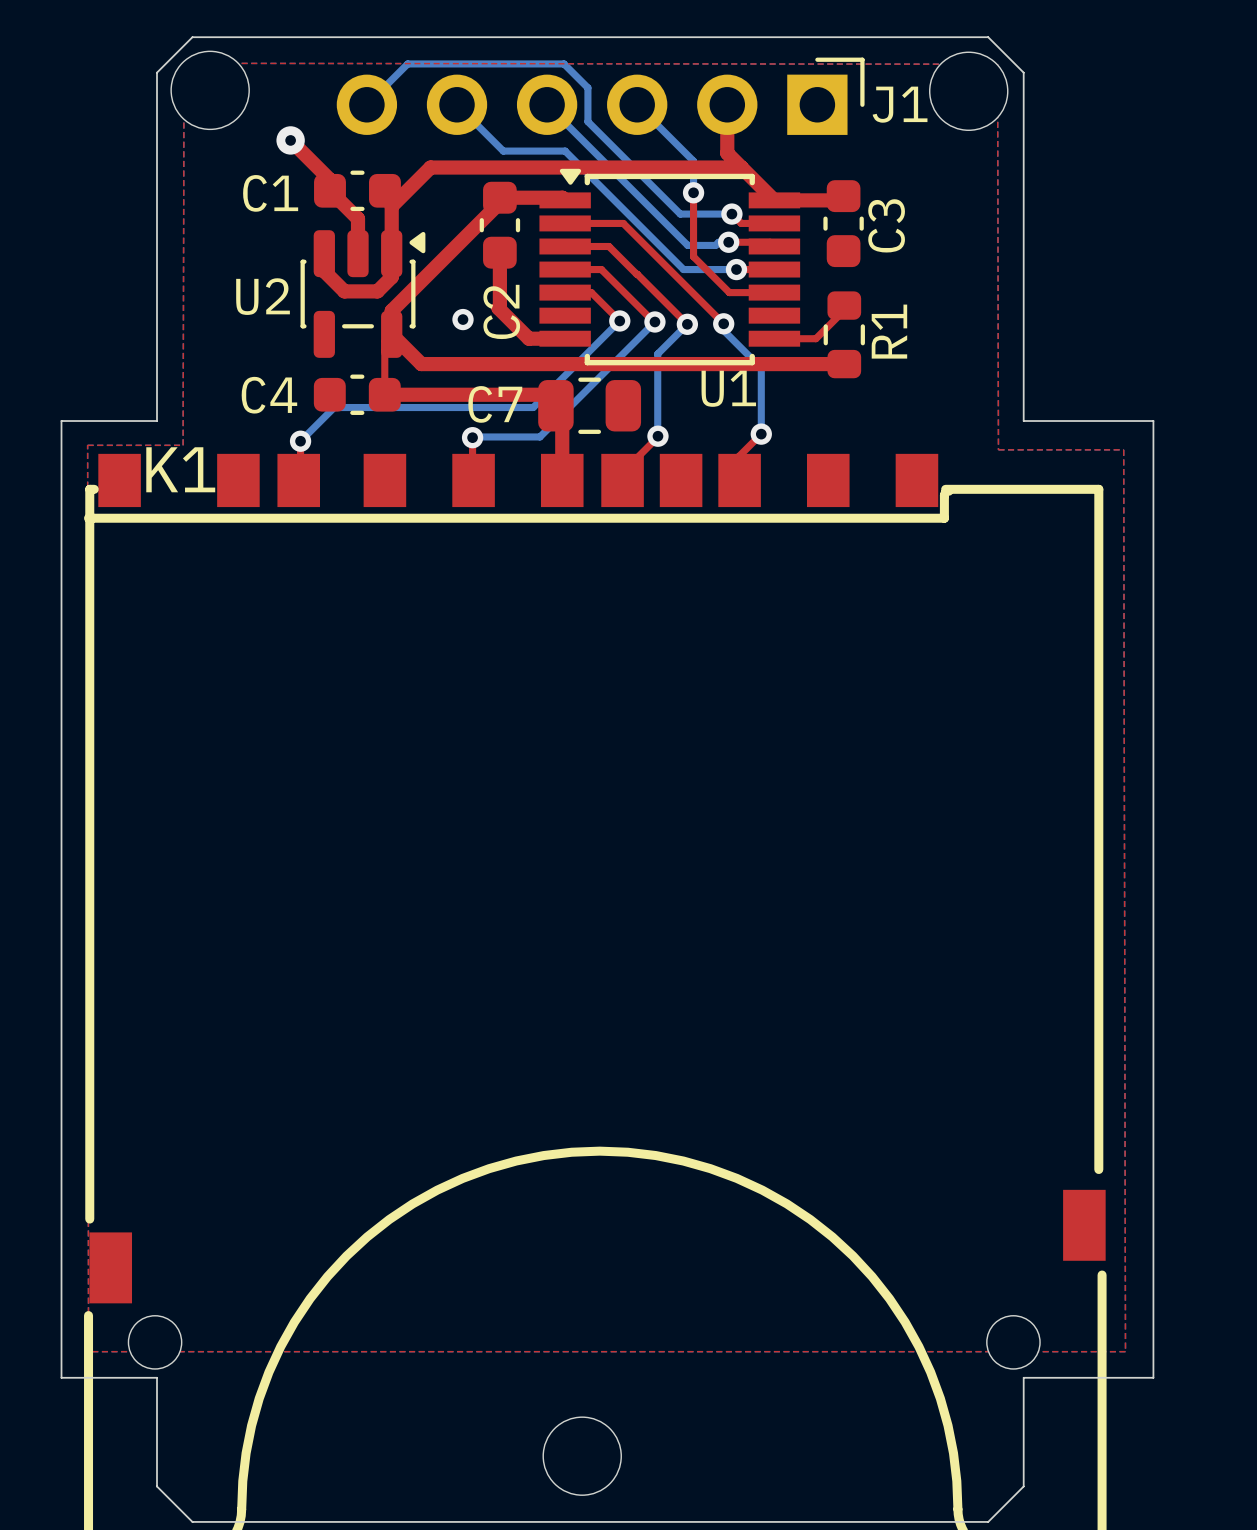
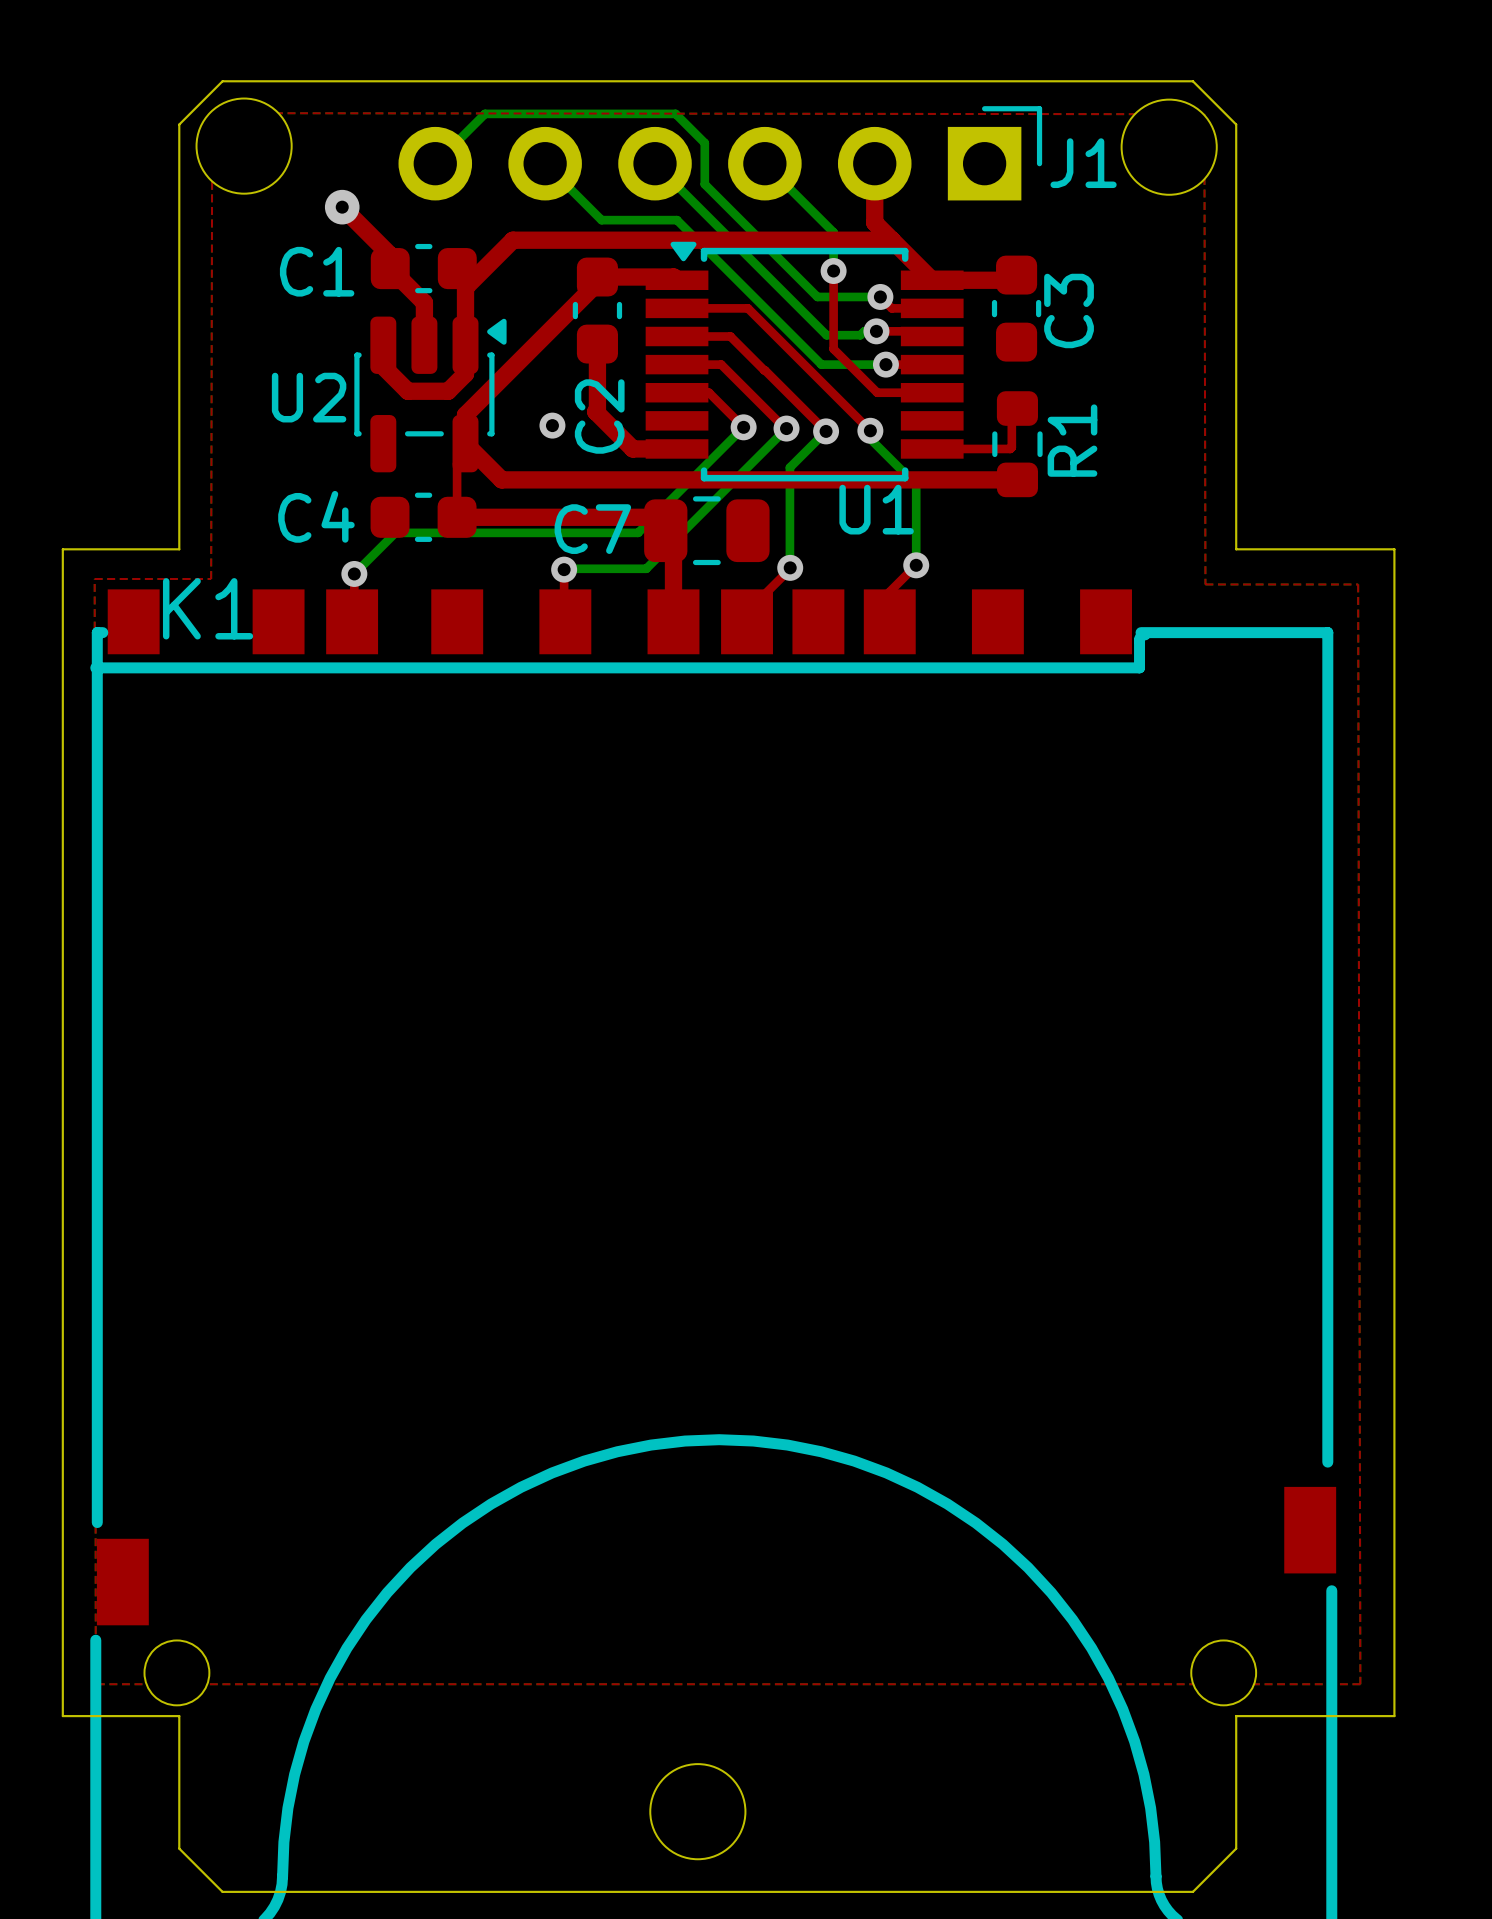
top track: (839, 314) (815, 338) -> (1011, 419) (1010, 448) (982, 448)

